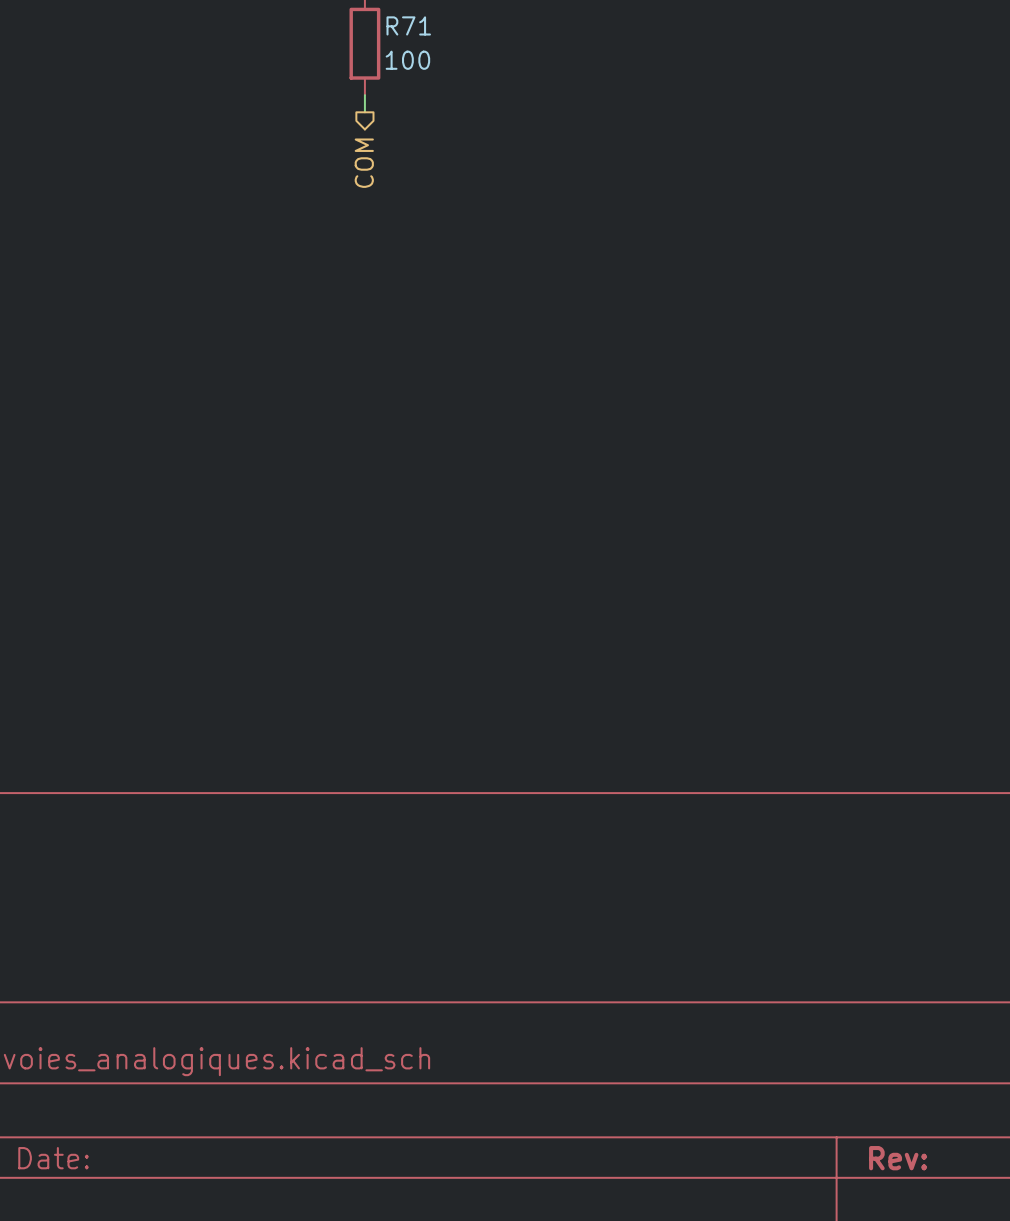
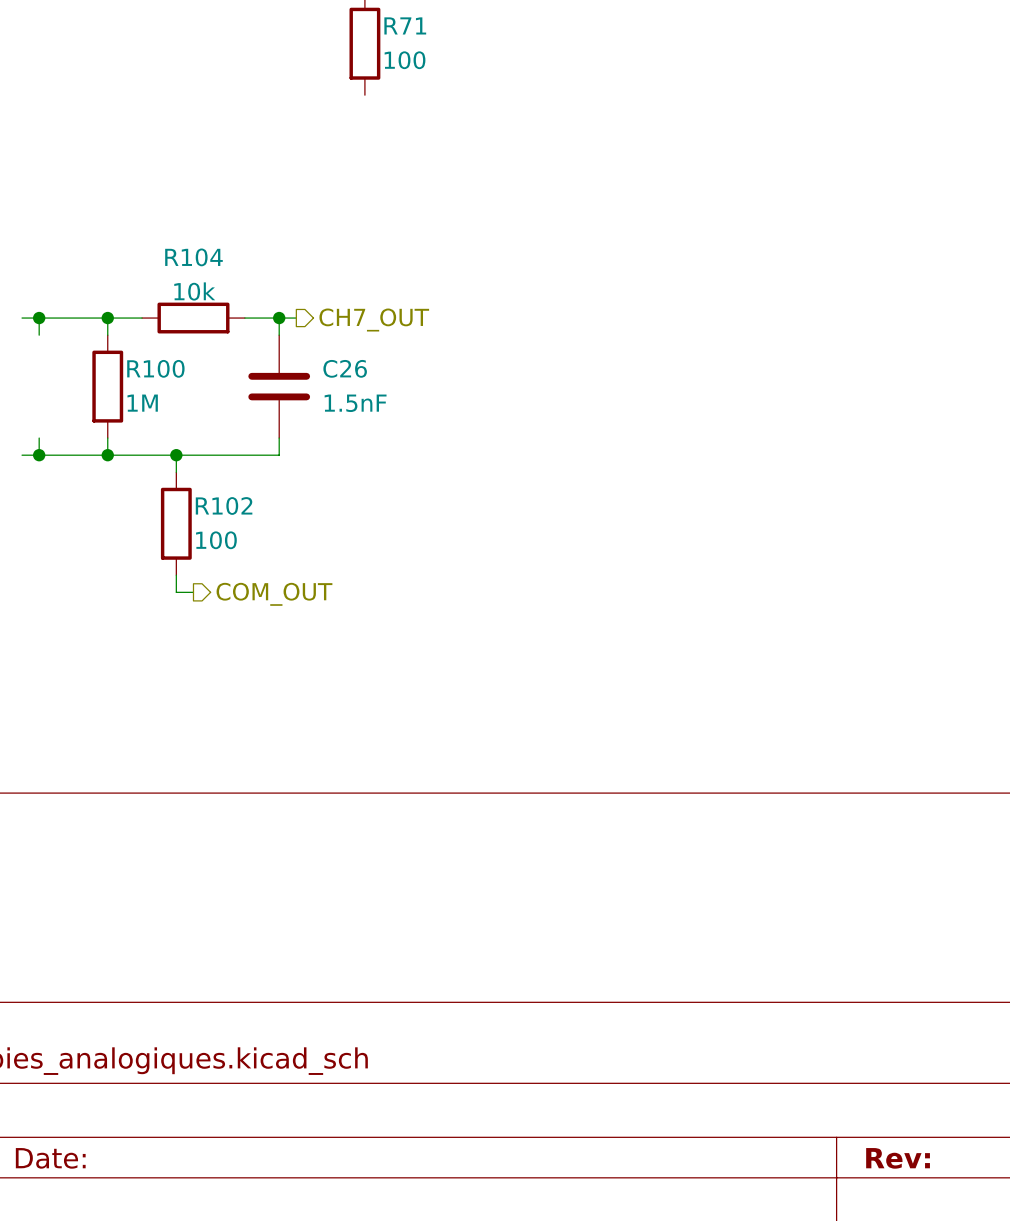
wire: (364, 95) (364, 112) -> (279, 318) (279, 335)
hierarchical label: COM (364, 163) -> none
wire: none -> (22, 318) (142, 318)
wire: none -> (39, 318) (39, 335)
junction: none -> (39, 318)
wire: none -> (107, 318) (107, 335)
junction: none -> (107, 318)
R104: none -> 10k (193, 318)
wire: none -> (244, 318) (296, 318)
junction: none -> (279, 318)
hierarchical label: none -> CH7_OUT (374, 320)
R100: none -> 1M (107, 386)
C26: none -> 1.5nF (279, 386)
wire: none -> (39, 438) (39, 455)
wire: none -> (107, 438) (107, 455)
wire: none -> (279, 438) (279, 455) (22, 455)
junction: none -> (39, 455)
junction: none -> (107, 455)
wire: none -> (176, 455) (176, 472)
junction: none -> (176, 455)
R102: none -> 100 (176, 523)
wire: none -> (176, 575) (176, 592) (193, 592)
hierarchical label: none -> COM_OUT (274, 594)

